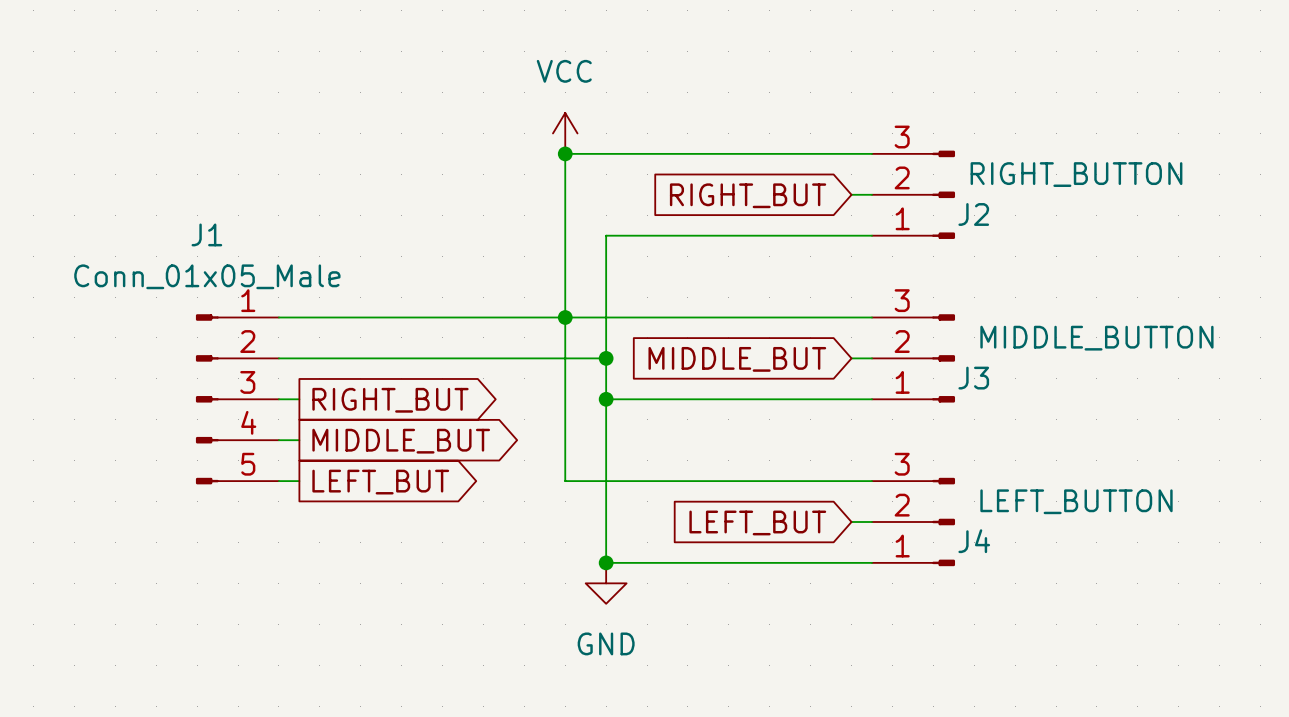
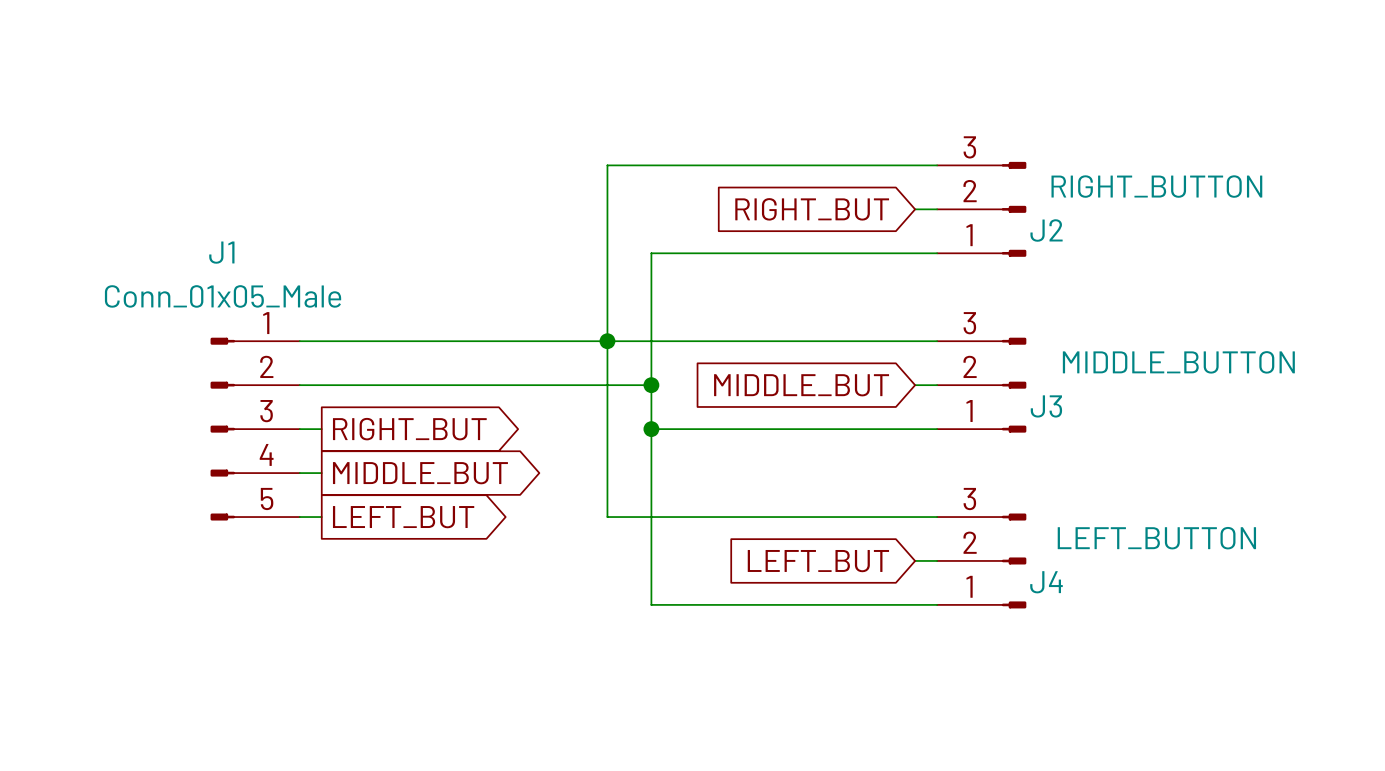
power symbol: VCC (565, 133) -> none
junction: (565, 153) -> none
junction: (606, 562) -> none
power symbol: GND (606, 583) -> none

